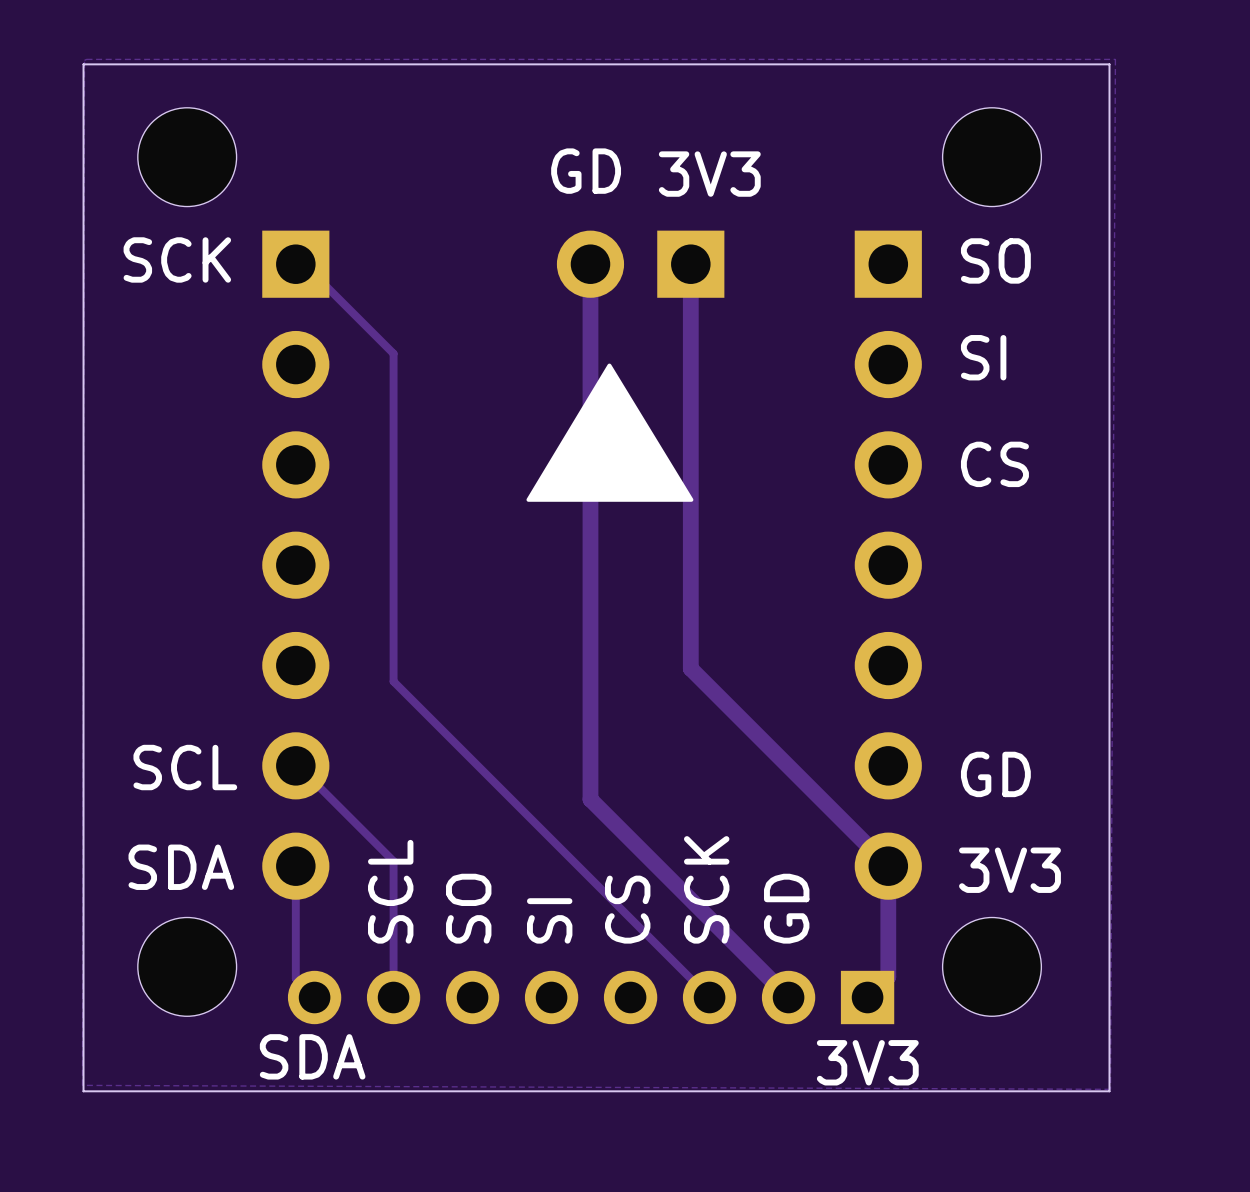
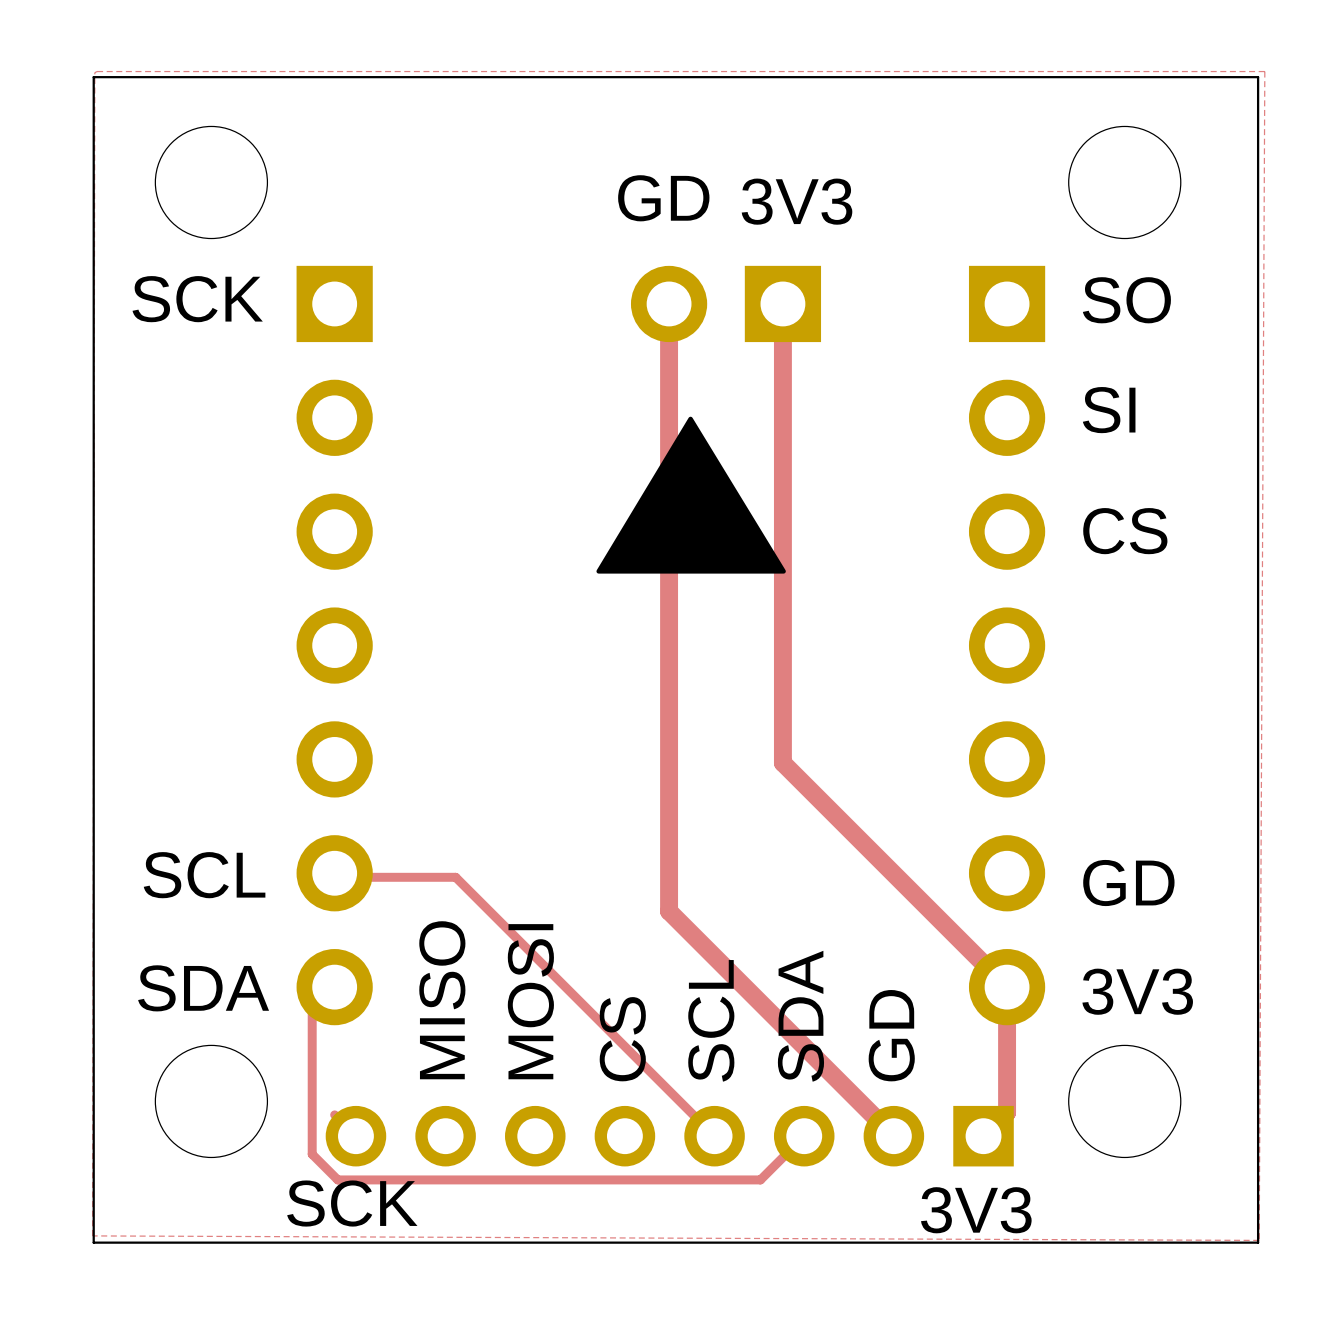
track: (304, 264) (393, 353) (393, 681) (709, 997) -> none
track: (301, 769) (393, 861) (393, 997) -> (341, 877) (455, 877) (714, 1136)
track: (295, 866) (295, 978) -> (334, 987) (312, 1009) (312, 1154) (337, 1179) (760, 1179) (804, 1136)
text: SCK (706, 889) -> SDA (800, 1016)
text: SCL (390, 891) -> MISO (442, 1000)
text: SO (468, 908) -> MOSI (530, 1001)
text: CS (627, 909) -> SCL (711, 1020)
text: SI (549, 920) -> CS (622, 1039)
text: SDA (312, 1056) -> SCK (352, 1203)

